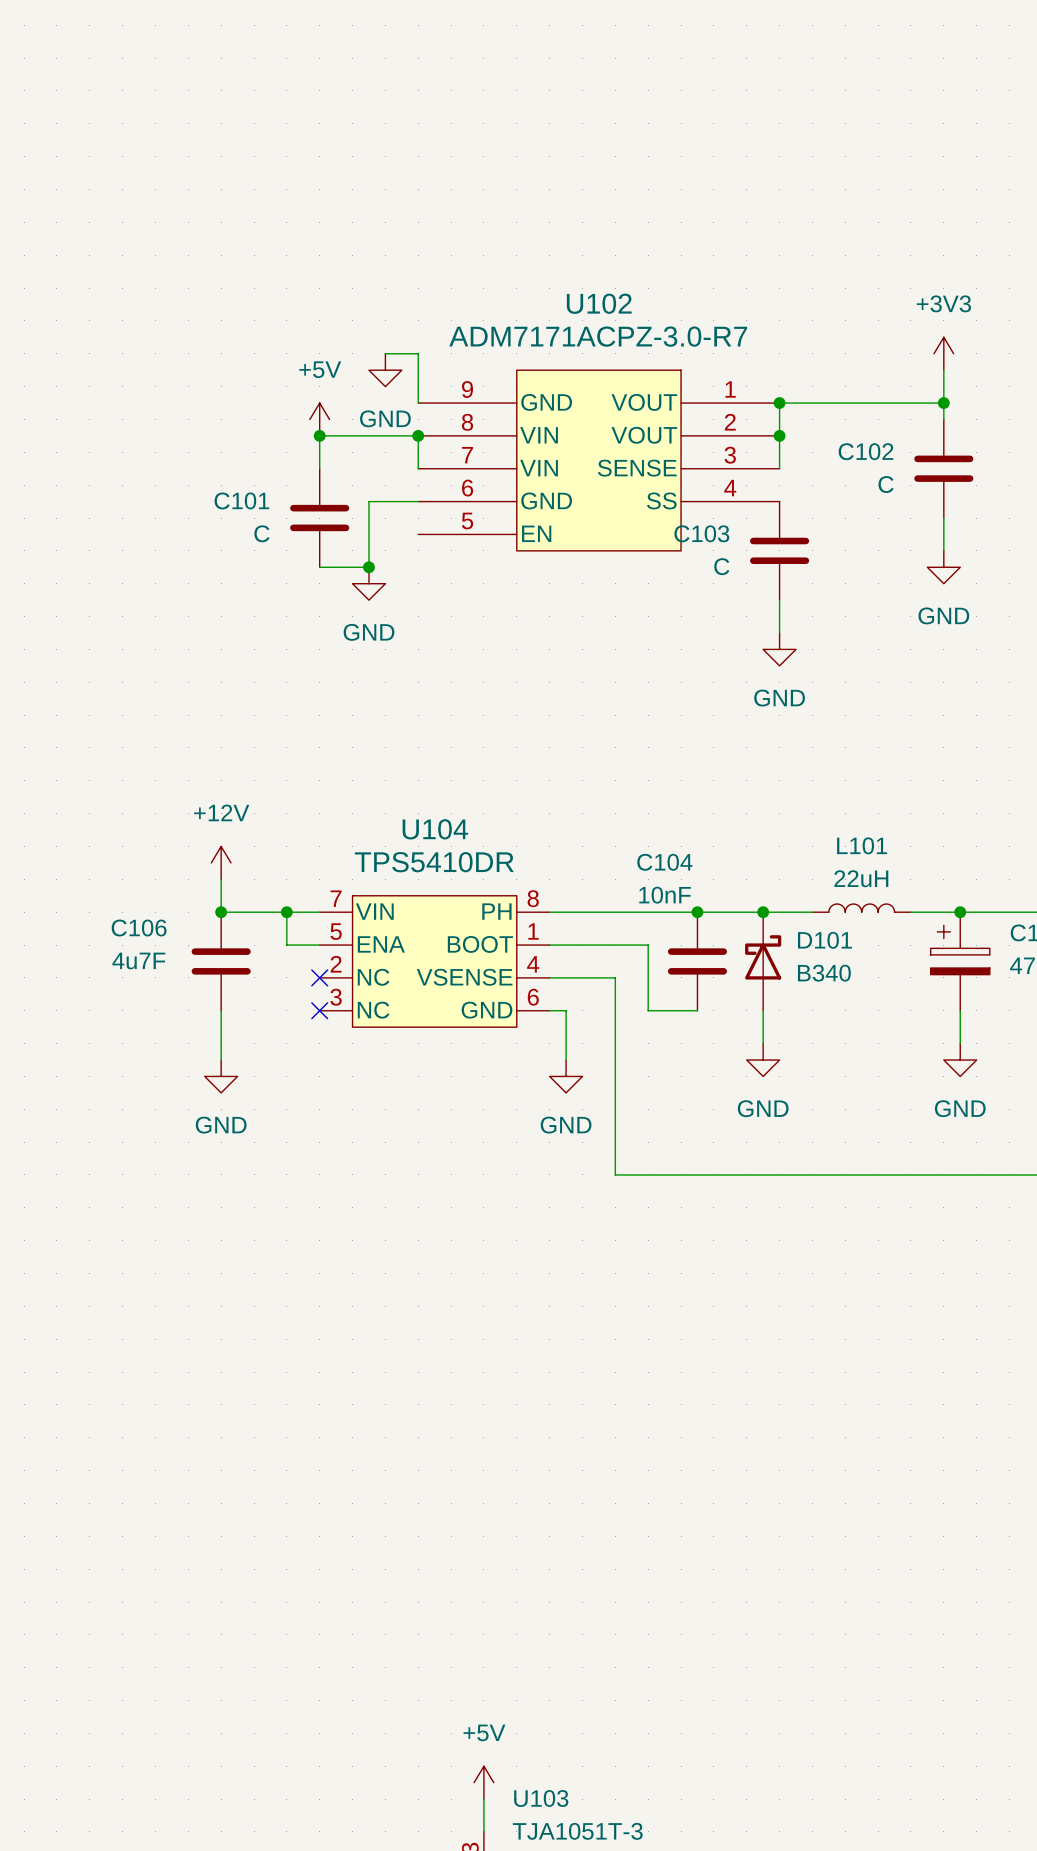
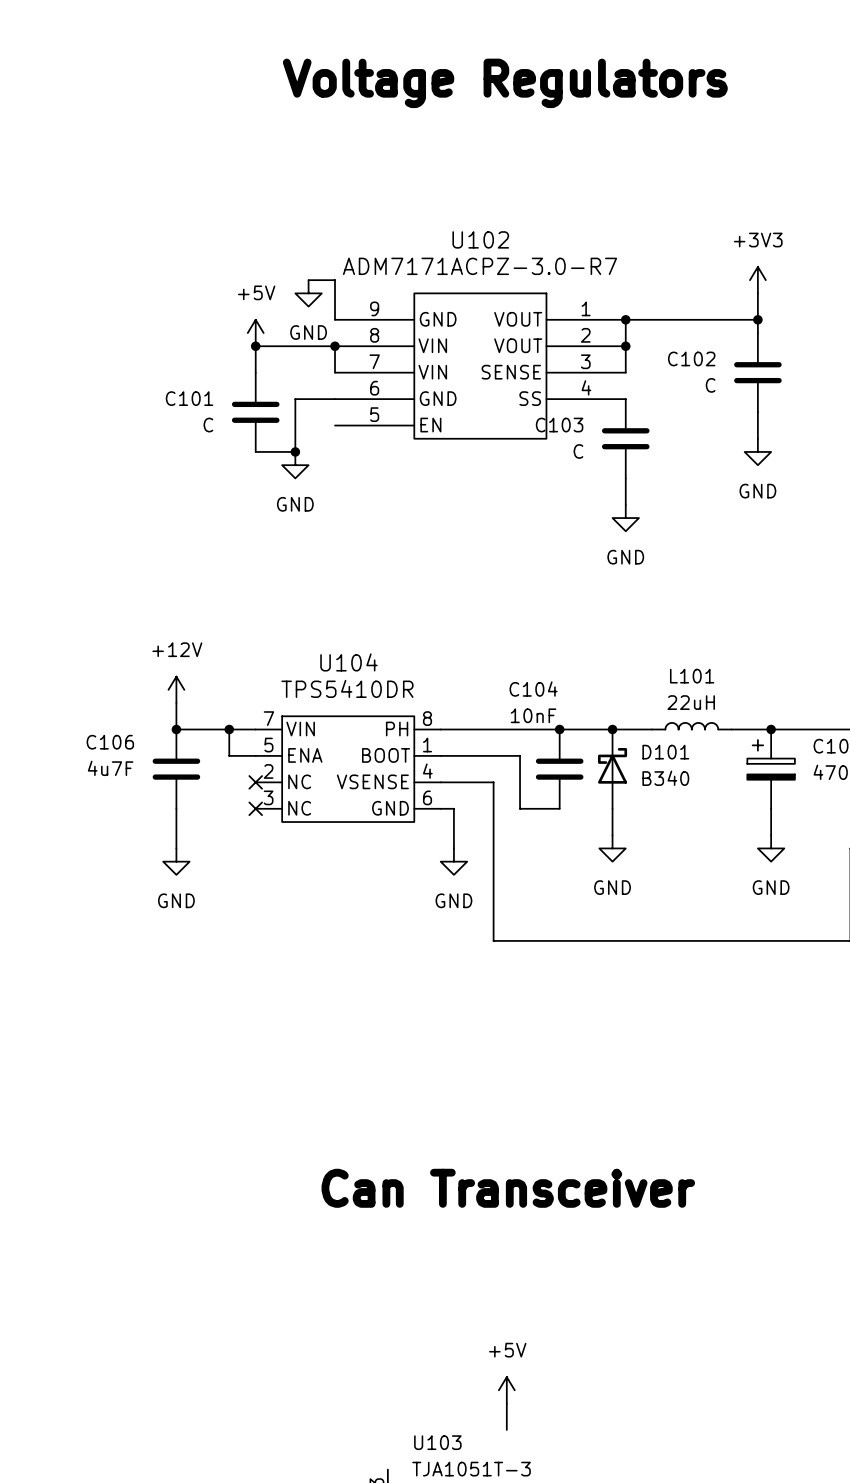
text: none -> Voltage Regulators (505, 83)
text: none -> Can Transceiver (508, 1188)
power symbol position: +5V (483, 1782) -> +5V (506, 1390)
wire: (483, 1799) (483, 1831) -> (506, 1403) (506, 1429)

